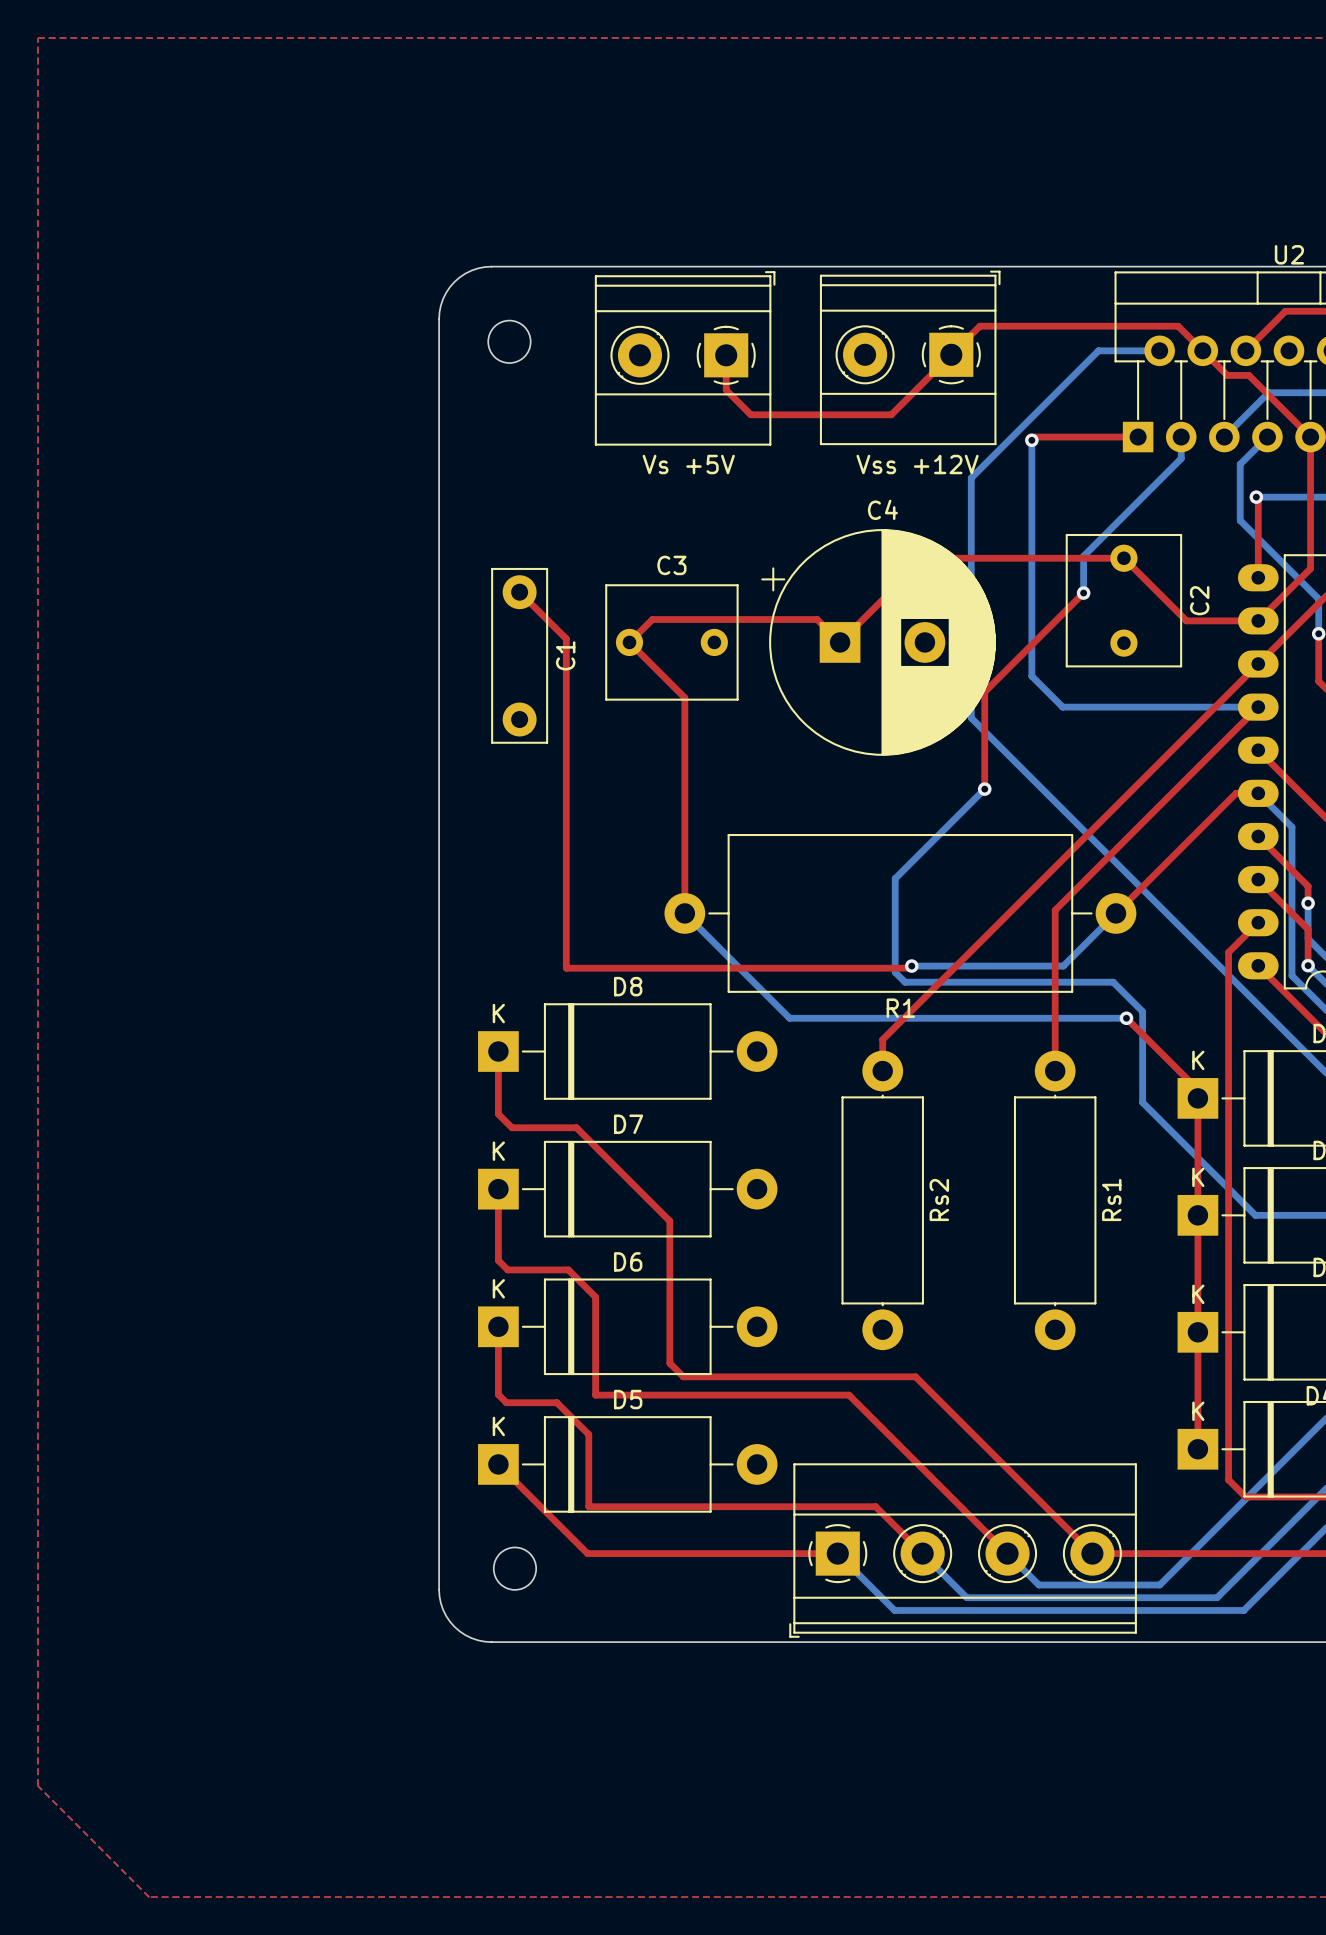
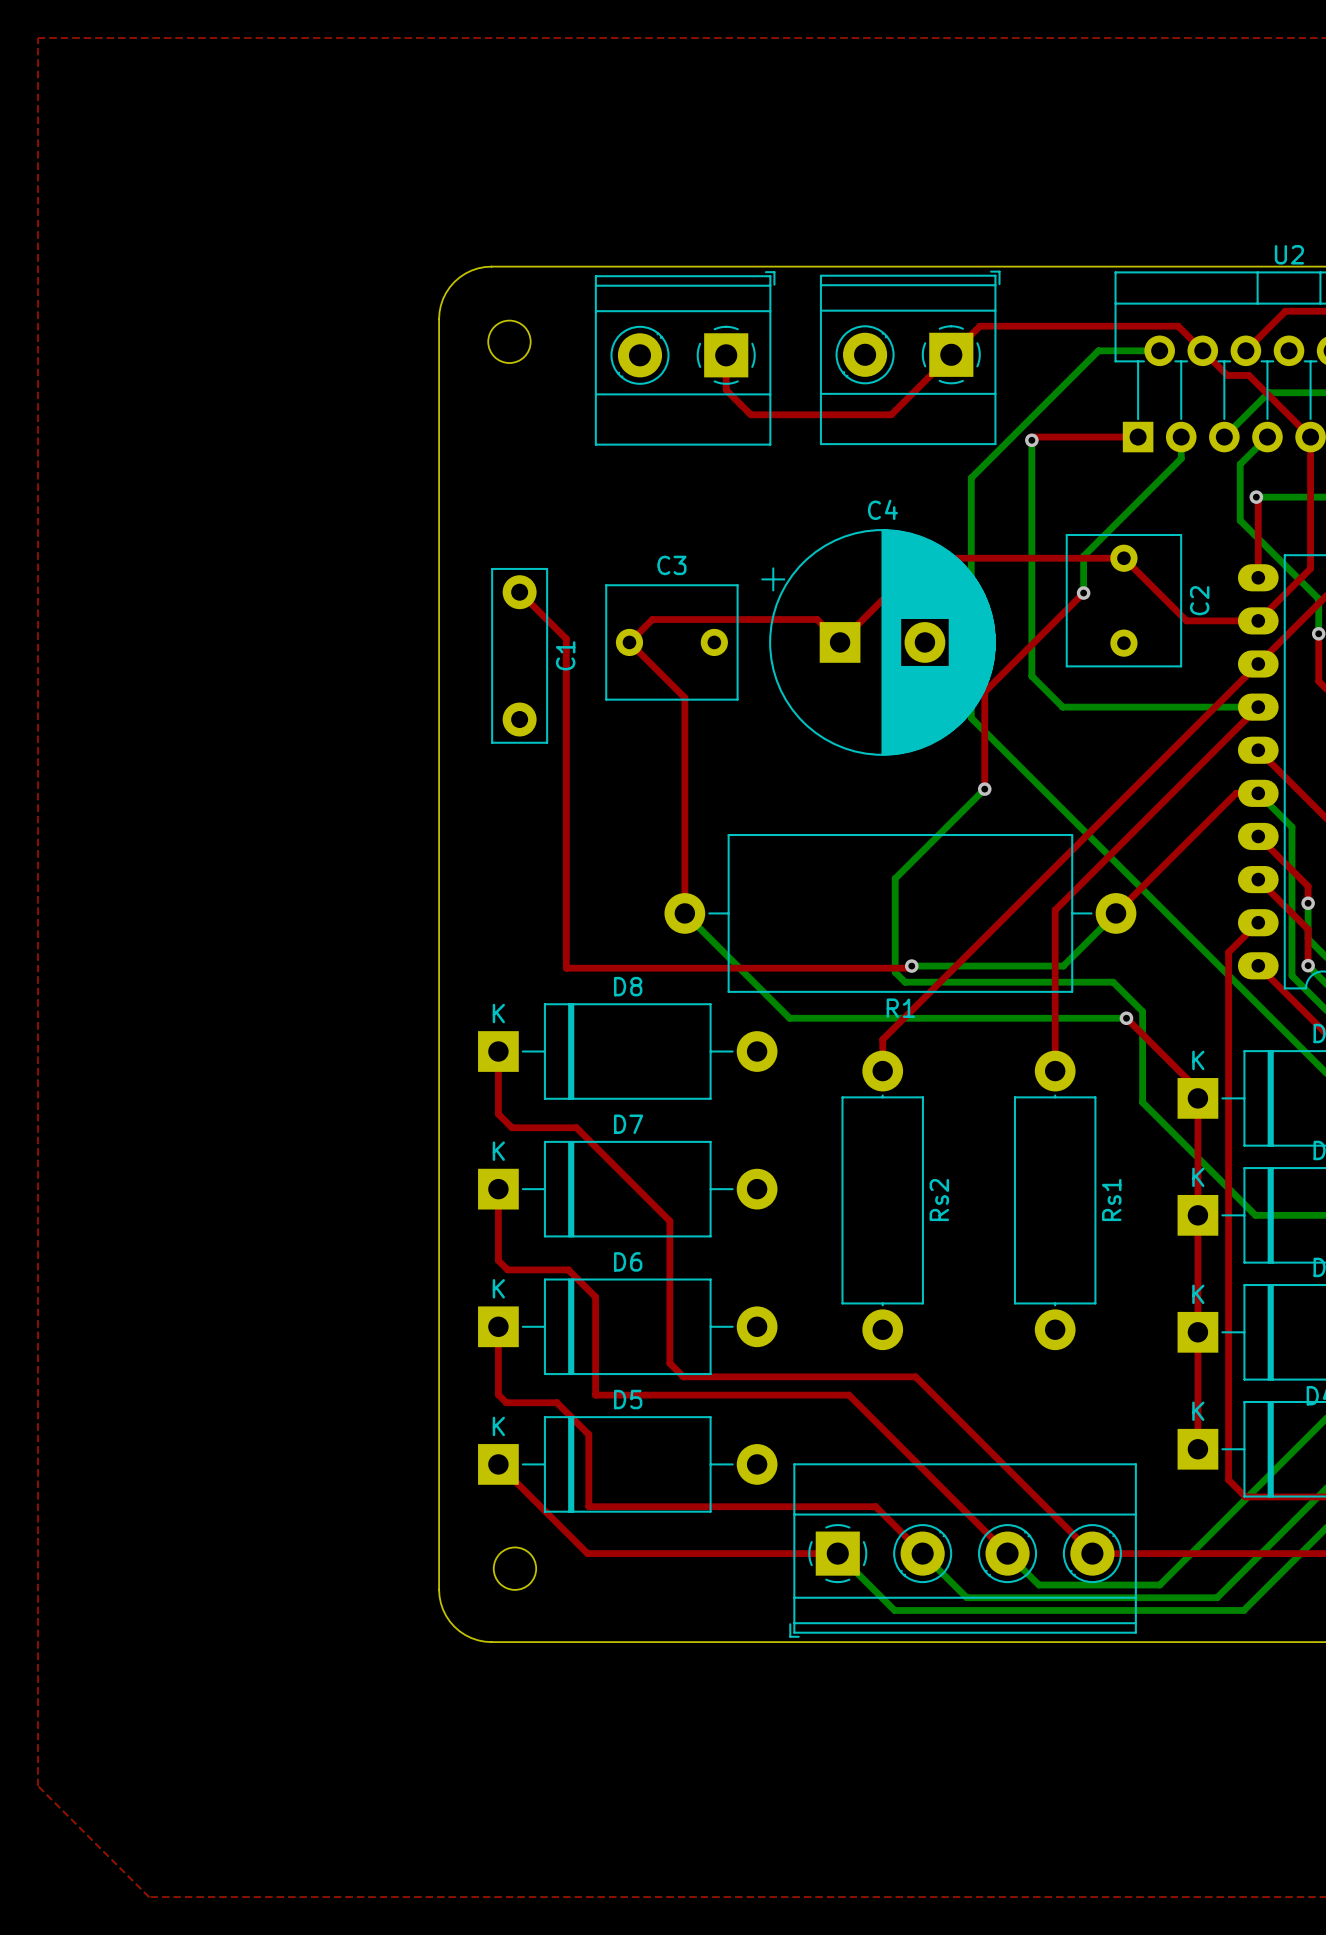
text: Vs +5V (688, 464) -> none
text: Vss +12V (917, 464) -> none

